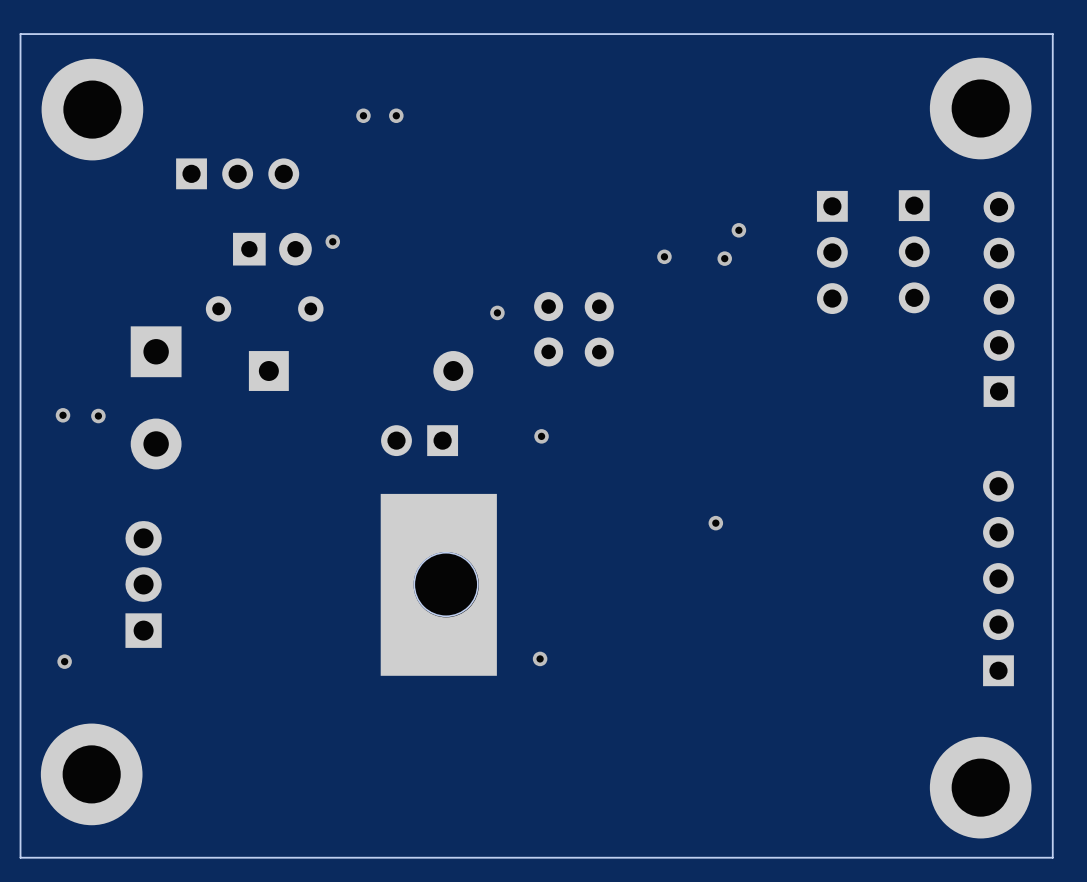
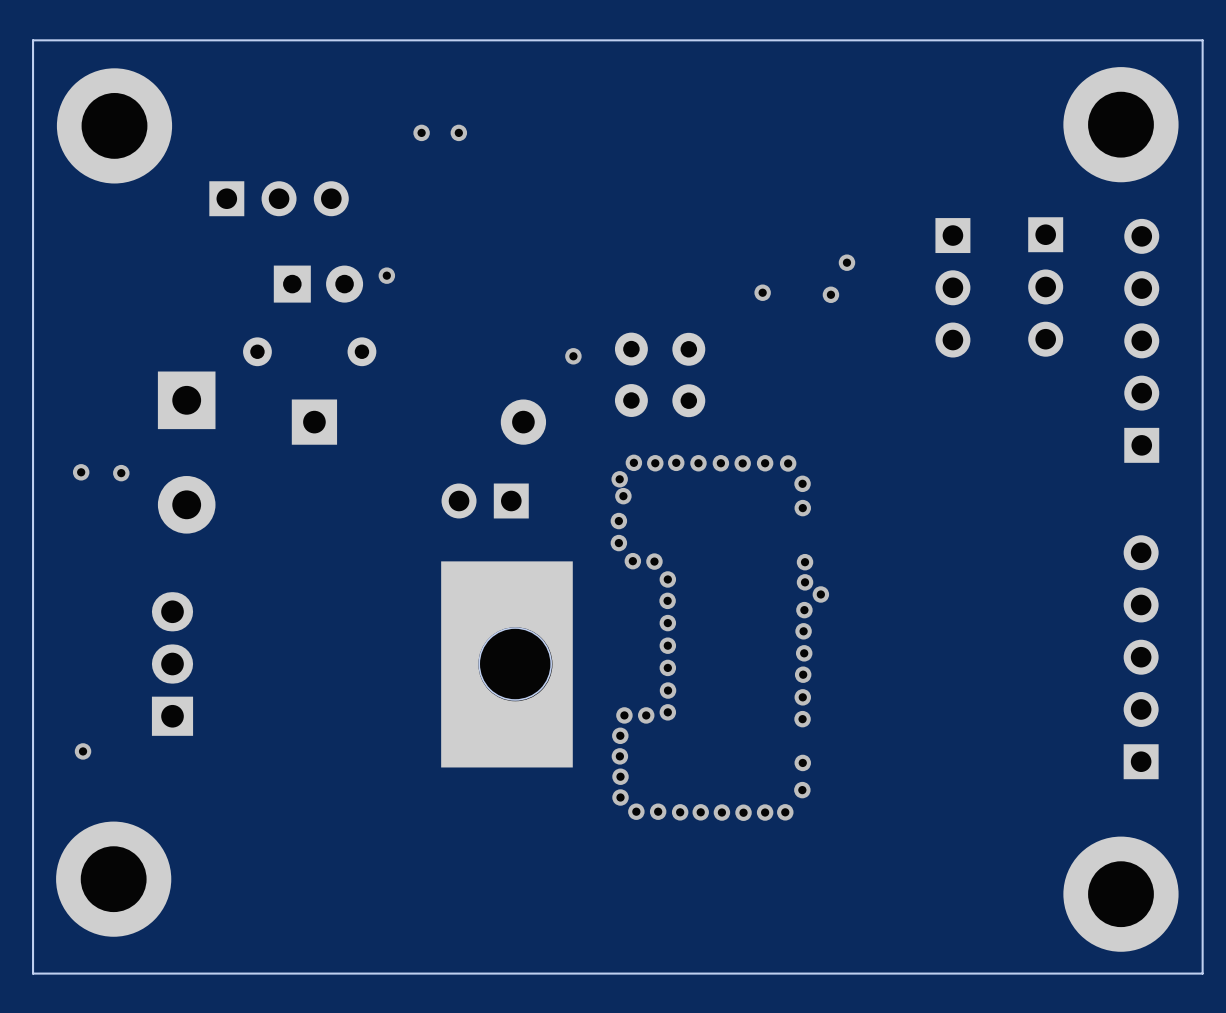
via: none -> (633, 462)
via: none -> (676, 462)
via: none -> (655, 463)
via: none -> (698, 463)
via: none -> (720, 463)
via: none -> (742, 463)
via: none -> (765, 463)
via: none -> (788, 463)
via: none -> (619, 479)
via: none -> (802, 483)
via: none -> (802, 508)
via: none -> (618, 521)
via: none -> (618, 543)
via: none -> (632, 561)
via: none -> (654, 561)
via: none -> (805, 562)
via: none -> (667, 579)
via: none -> (805, 582)
via: none -> (667, 600)
via: none -> (804, 610)
via: none -> (667, 623)
via: none -> (803, 631)
via: none -> (667, 645)
via: none -> (804, 653)
via: none -> (667, 667)
via: none -> (803, 674)
via: none -> (668, 690)
via: none -> (802, 697)
via: none -> (667, 712)
via: none -> (624, 715)
via: none -> (646, 715)
via: none -> (802, 719)
via: none -> (620, 735)
via: (540, 658) -> none
via: none -> (619, 756)
via: none -> (802, 762)
via: none -> (620, 776)
via: none -> (802, 790)
via: none -> (620, 797)
via: none -> (636, 811)
via: none -> (658, 811)
via: none -> (680, 812)
via: none -> (700, 812)
via: none -> (721, 812)
via: none -> (743, 812)
via: none -> (765, 812)
via: none -> (785, 812)

